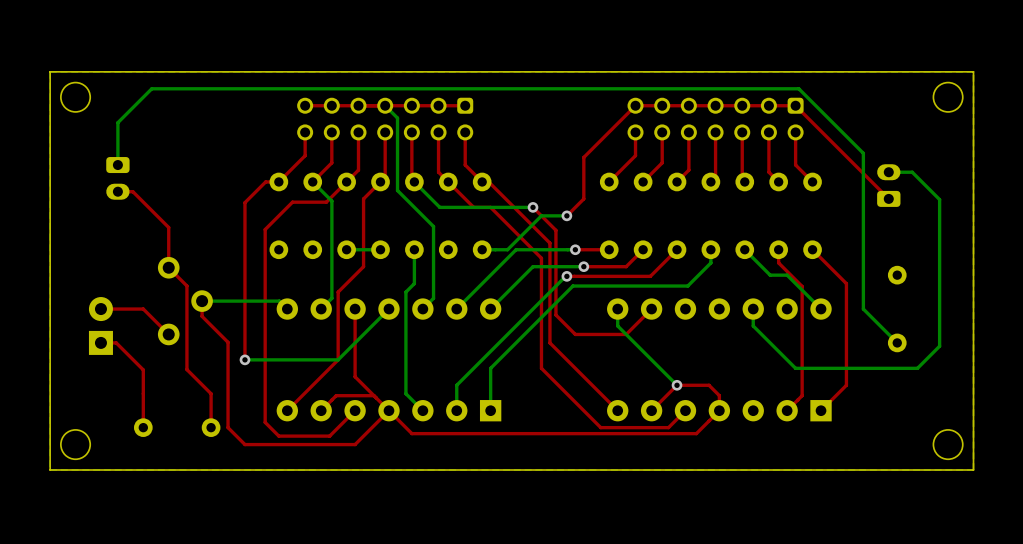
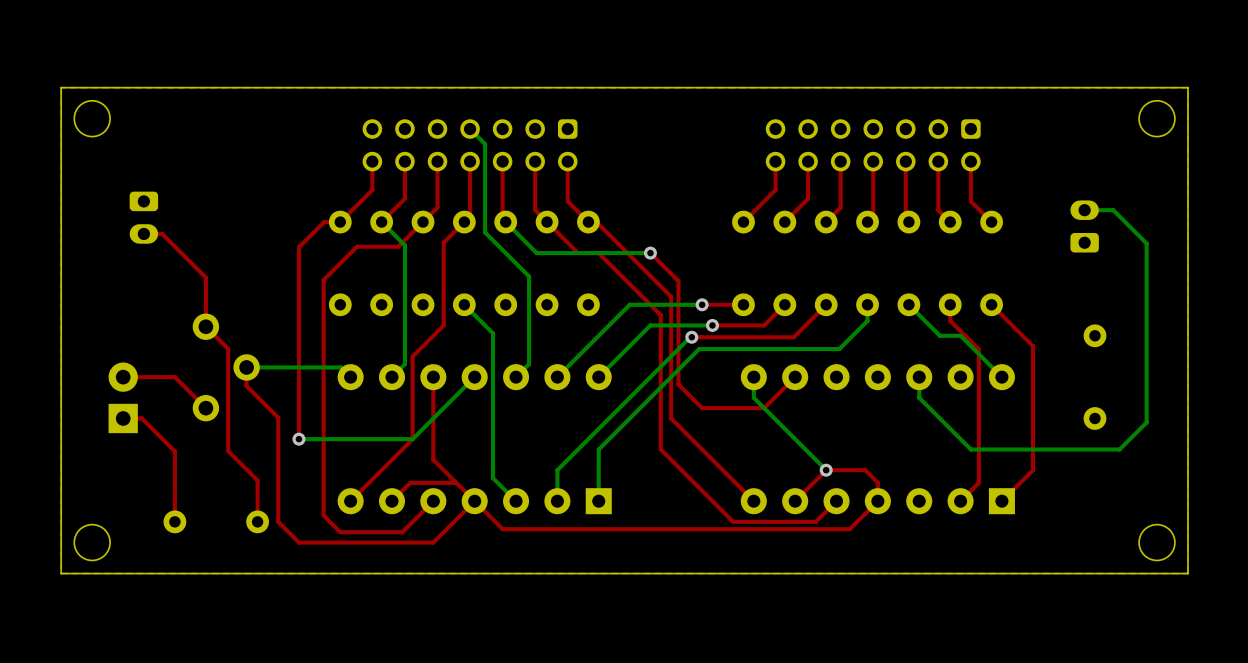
top track: (465, 105) (305, 105) -> none
bottom track: (117, 165) (117, 122) (151, 88) (798, 88) (863, 153) (863, 309) (897, 342) -> none
top track: (888, 198) (795, 105) (635, 105) (583, 157) (583, 198) (566, 215) -> none
bottom track: (566, 215) (541, 215) (507, 249) (482, 249) -> none
via: (566, 215) -> none
bottom track: (380, 249) (346, 249) -> none
bottom track: (414, 249) (414, 283) (405, 292) (405, 393) -> (464, 304) (493, 333) (493, 478) (495, 480)

